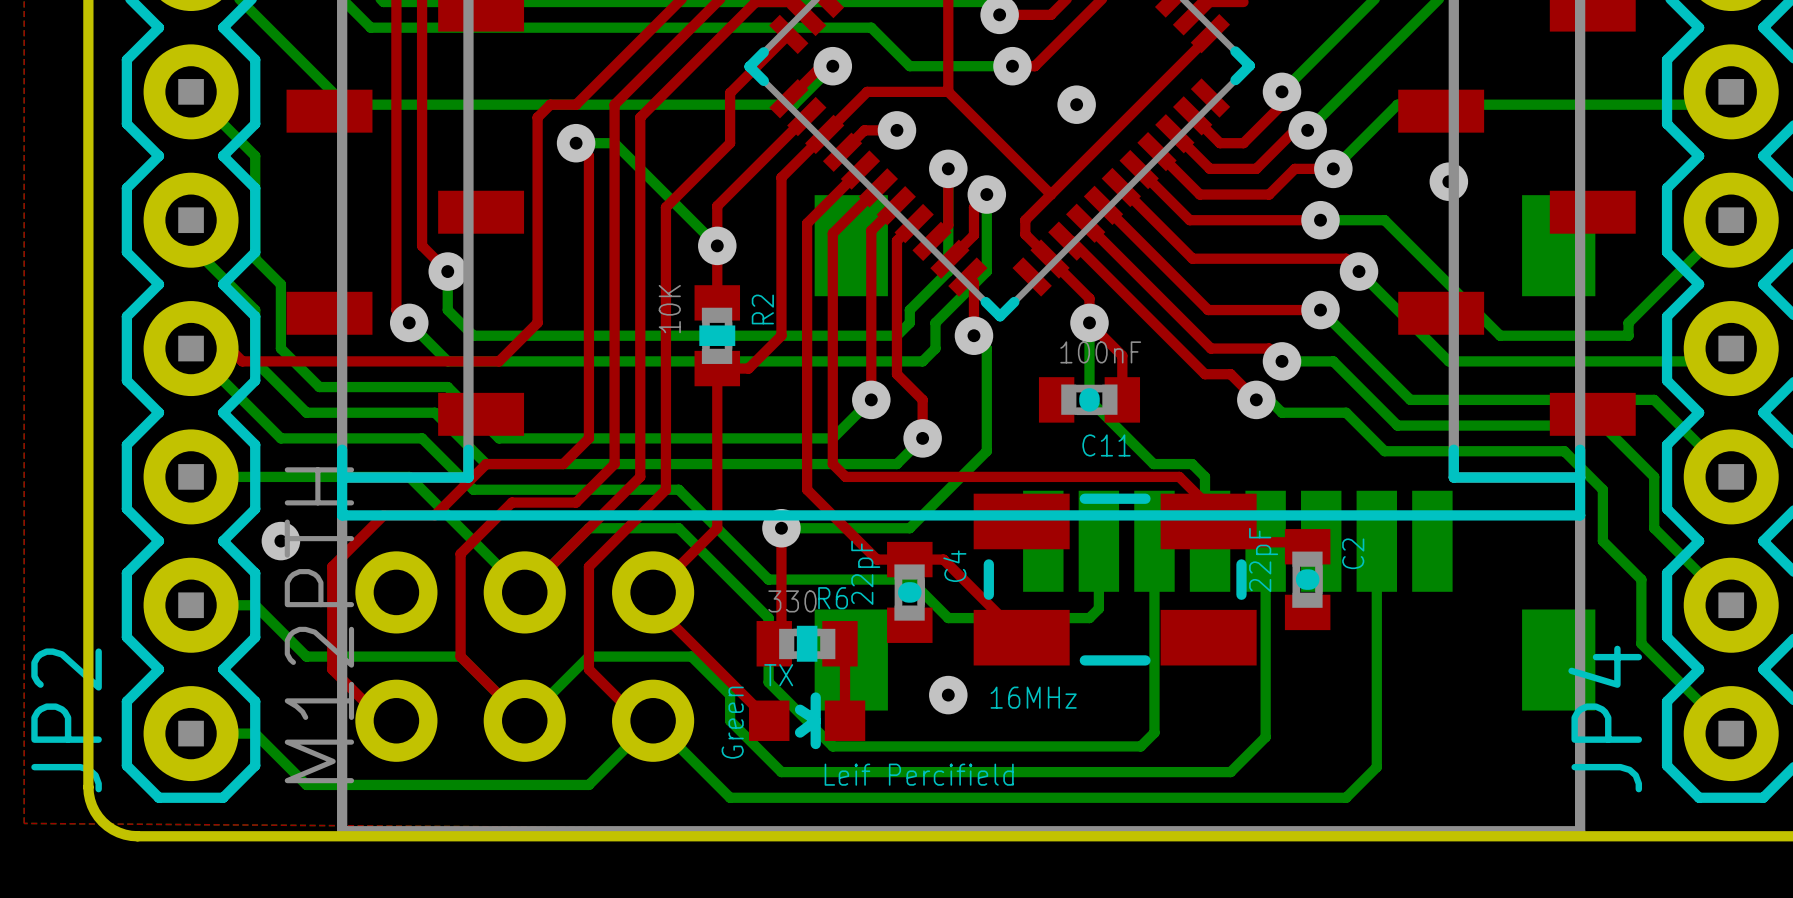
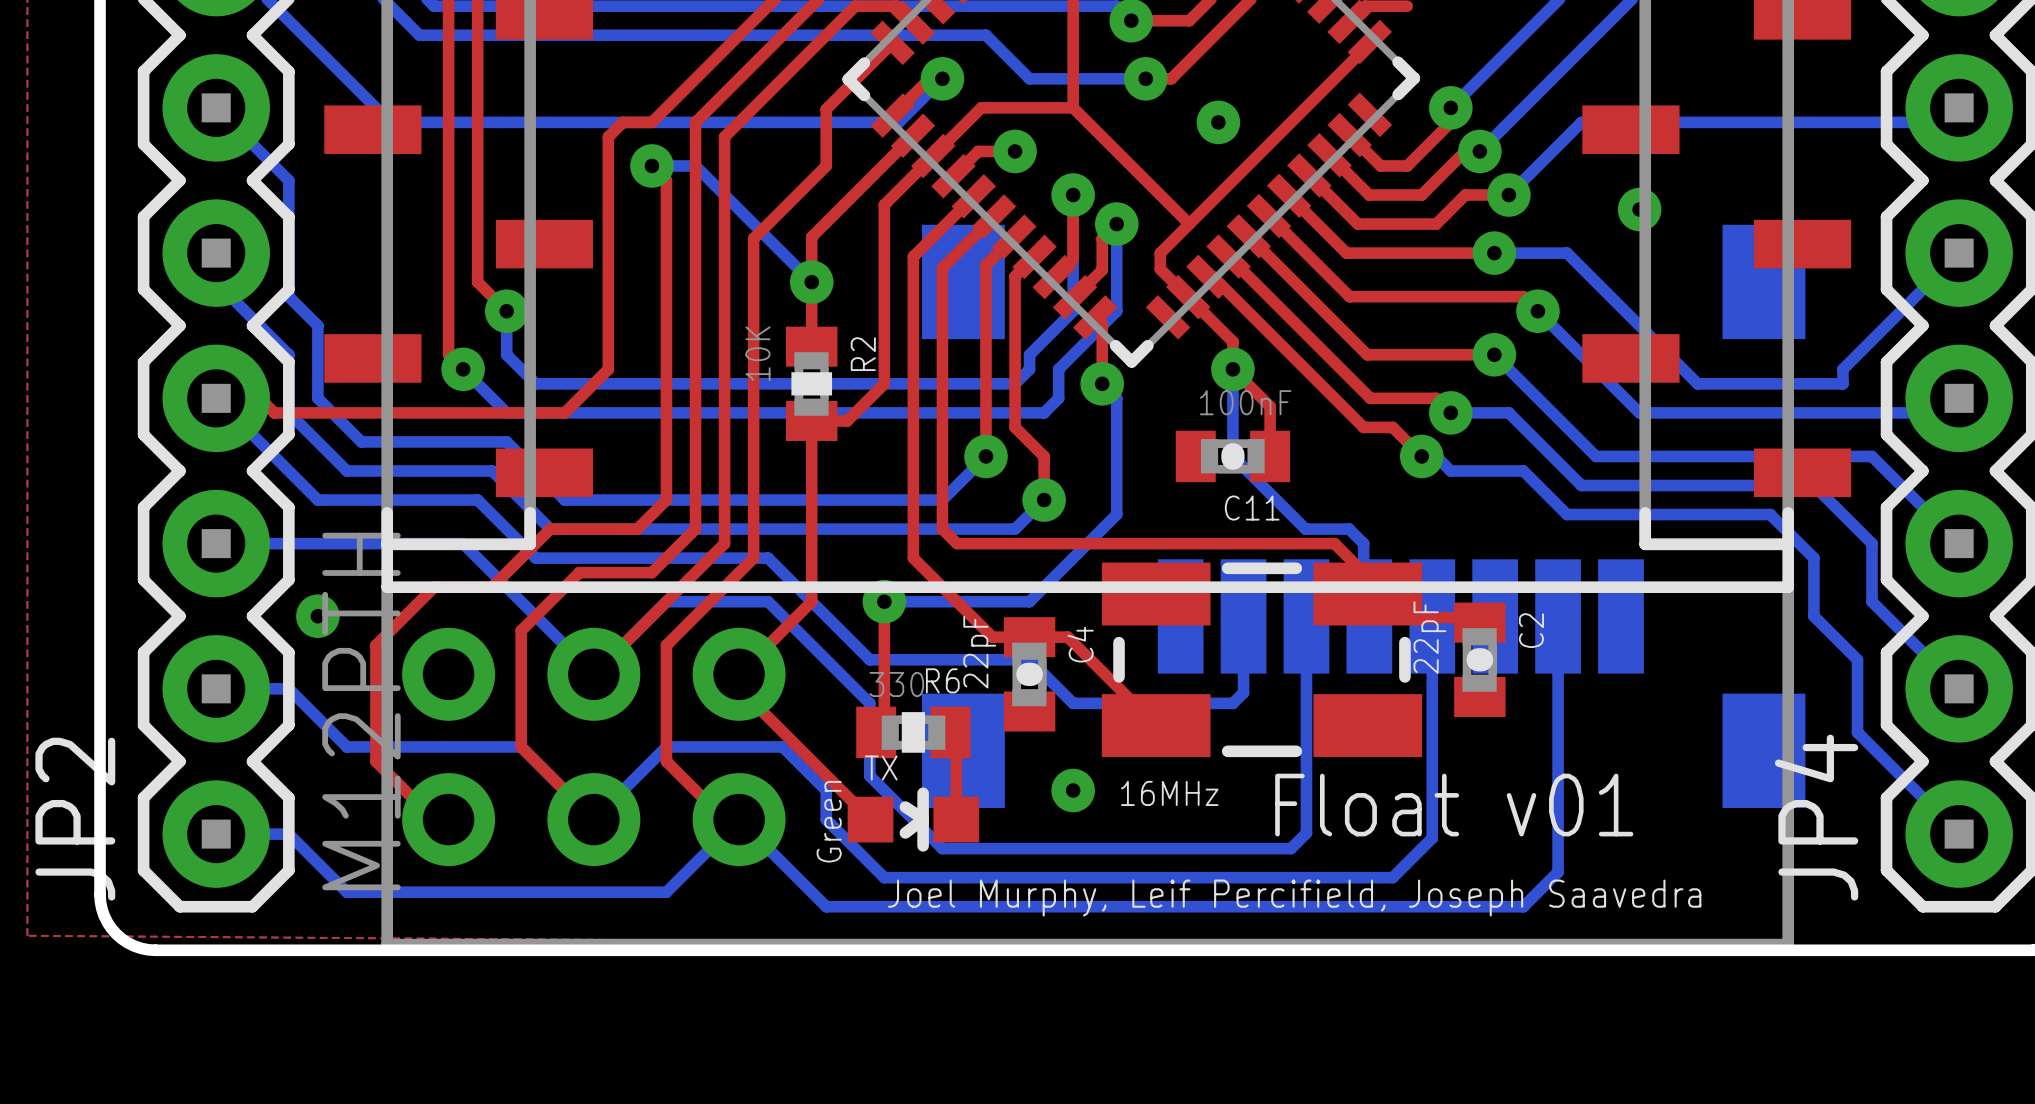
text: none -> Float v01 (1454, 805)
text: Leif Percifield (919, 774) -> Joel Murphy, Leif Percifield, Joseph Saavedra (1294, 898)

